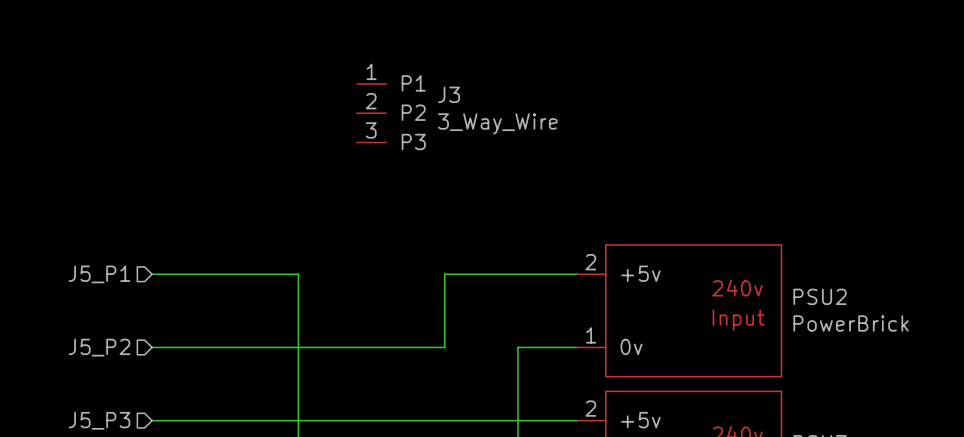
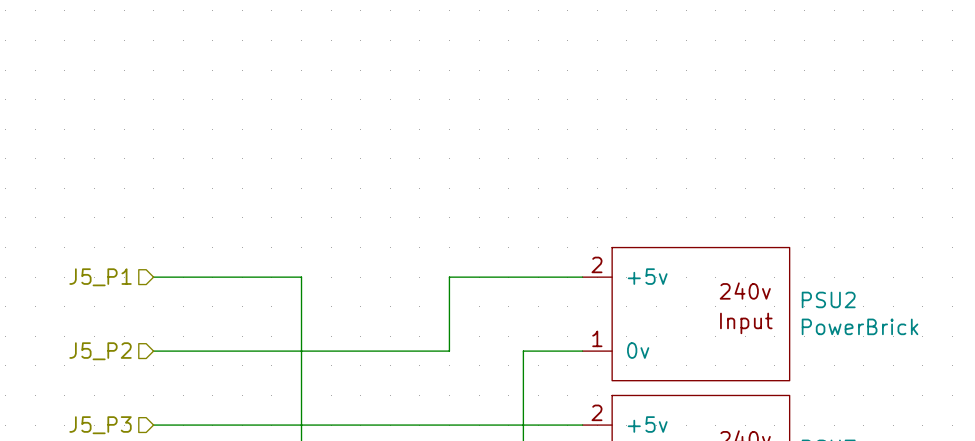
J3: 3_Way_Wire (371, 113) -> none

